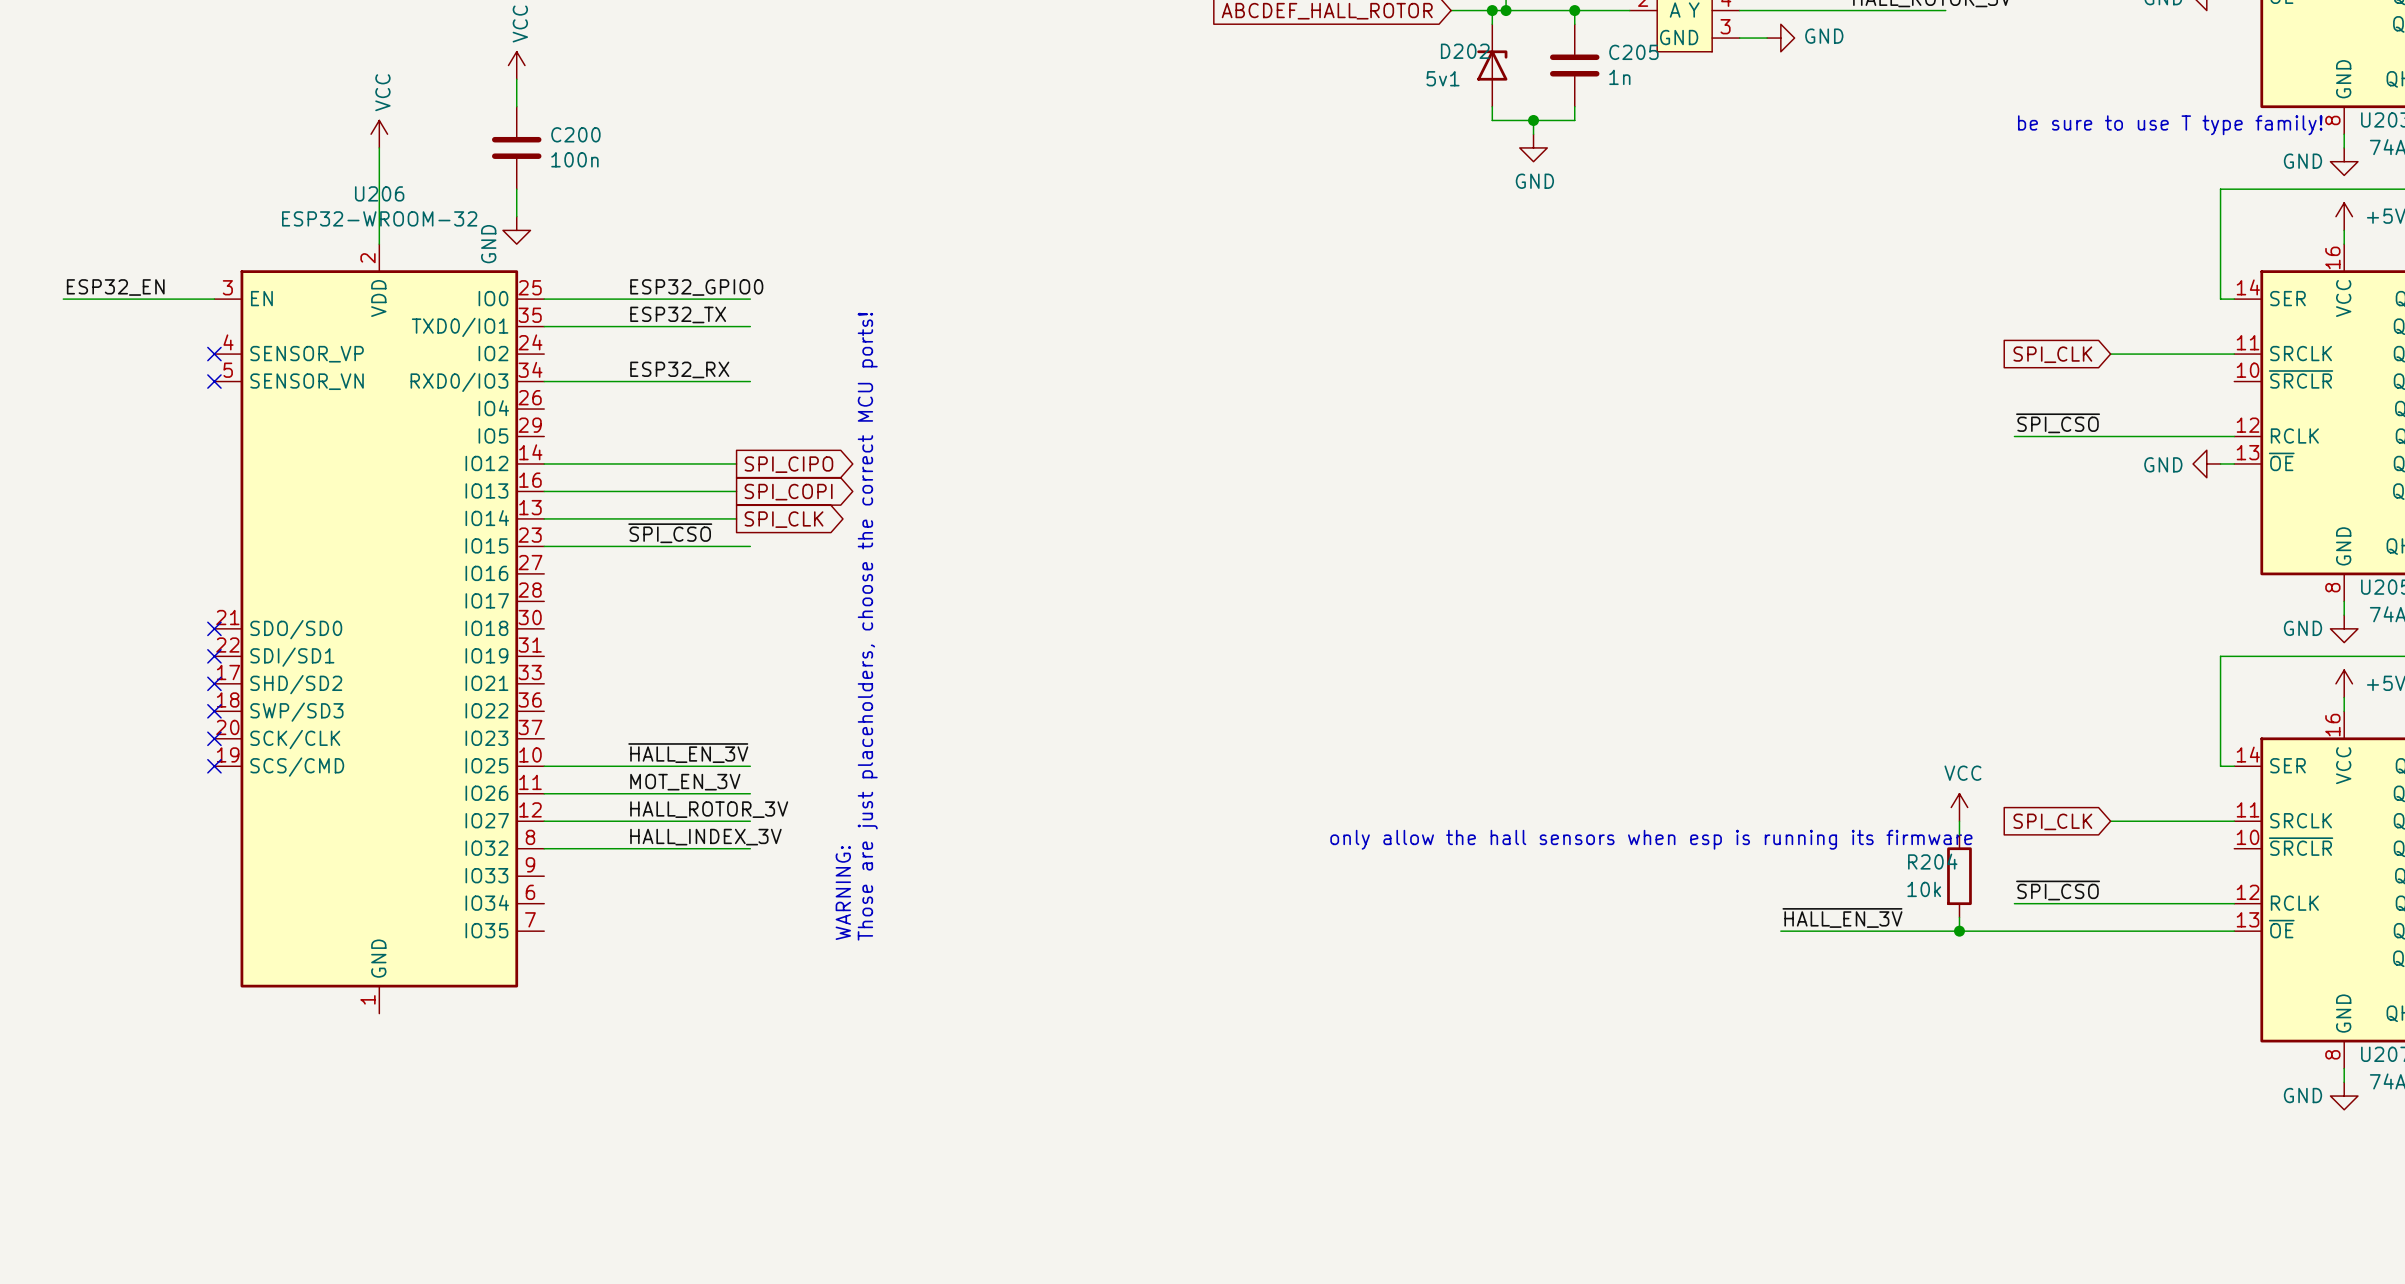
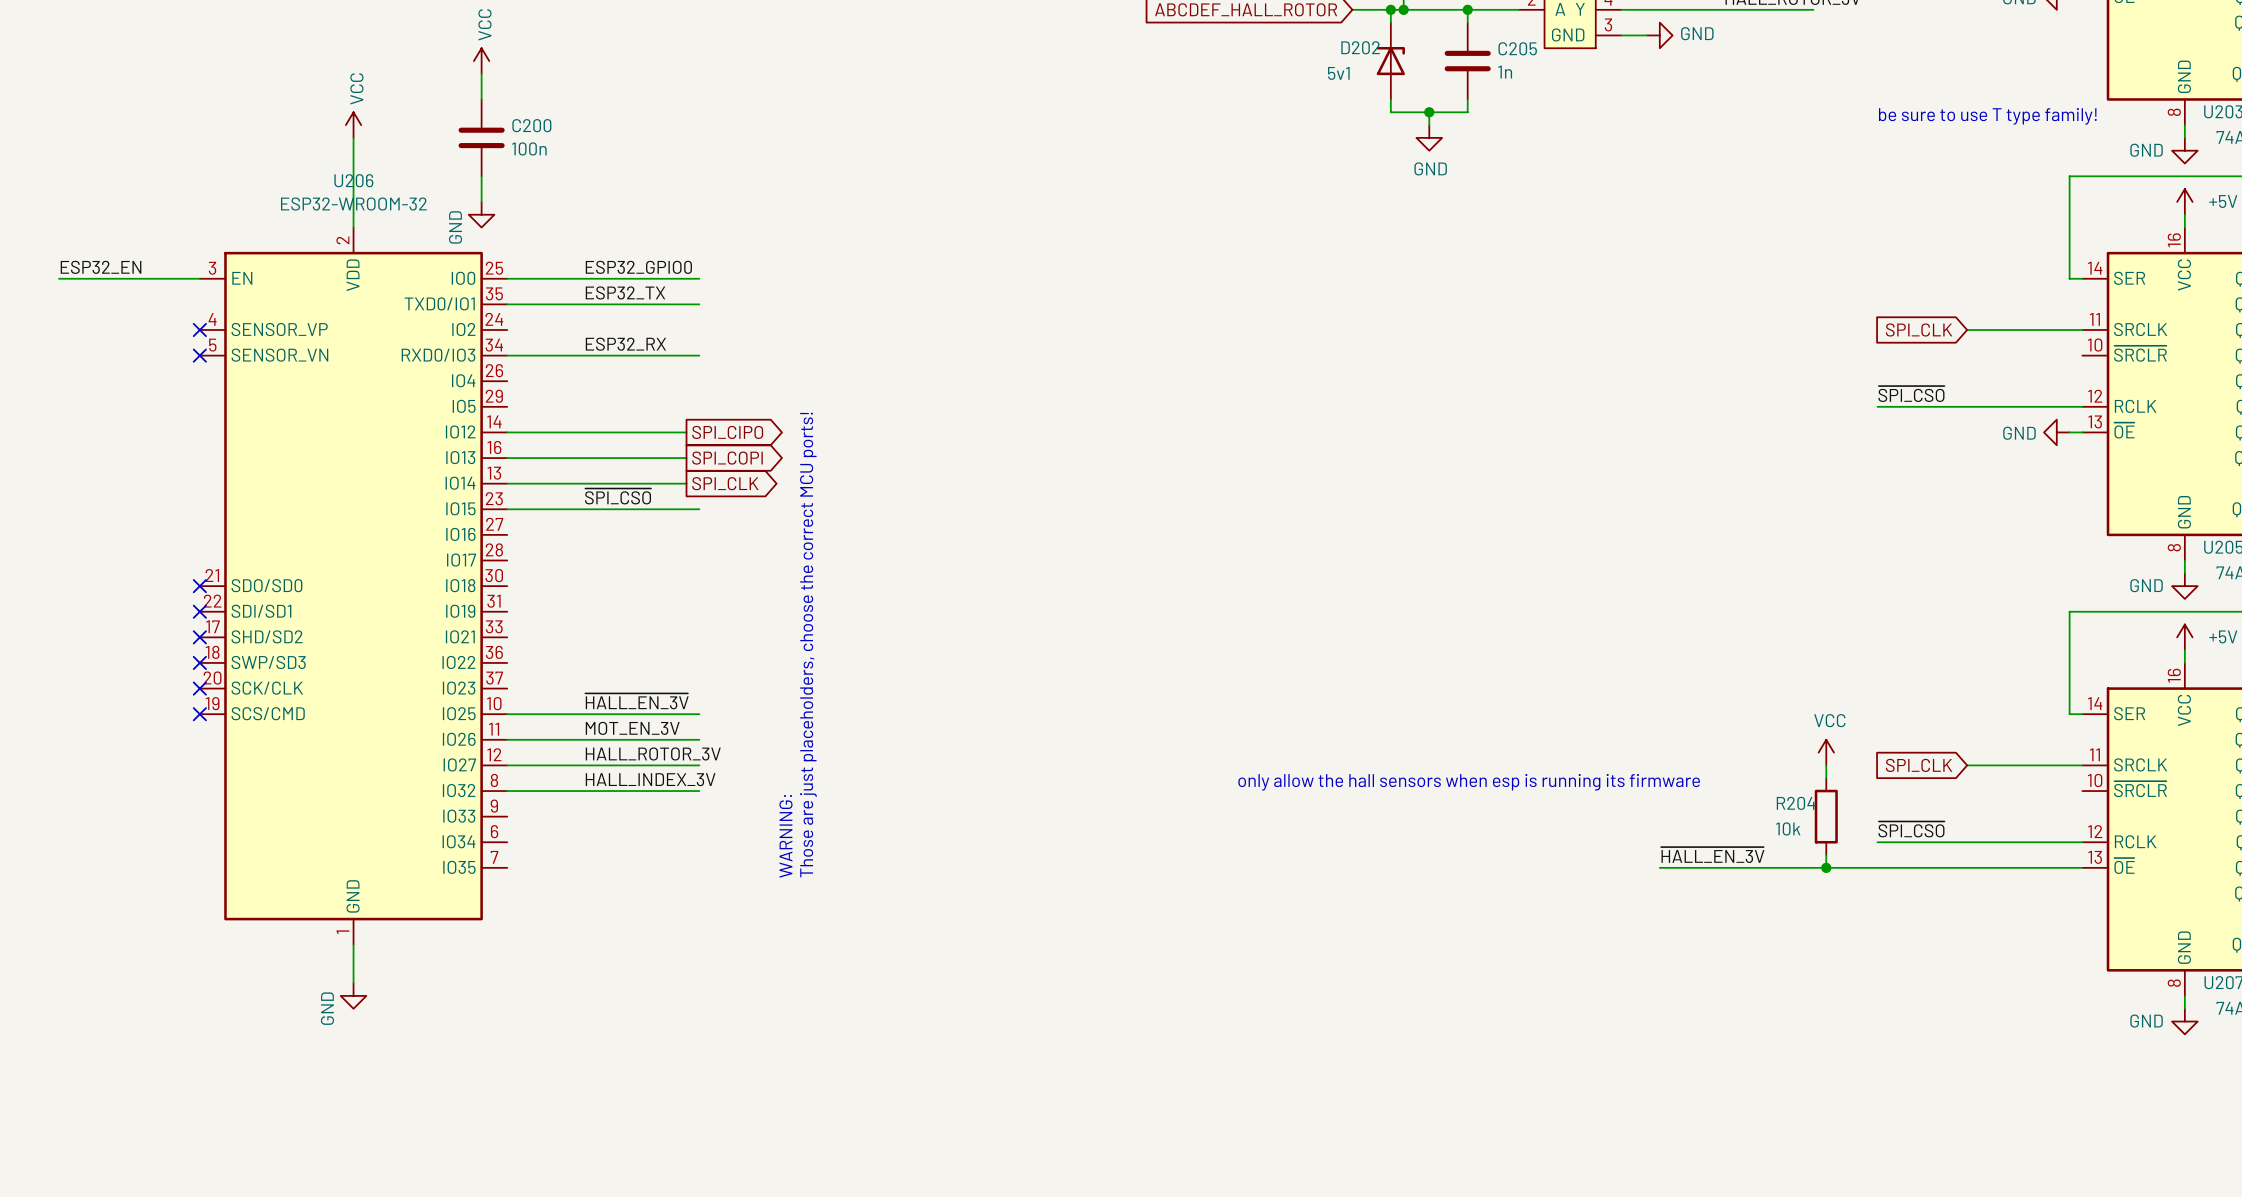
wire: none -> (353, 944) (353, 983)
power symbol: none -> GND (353, 995)

